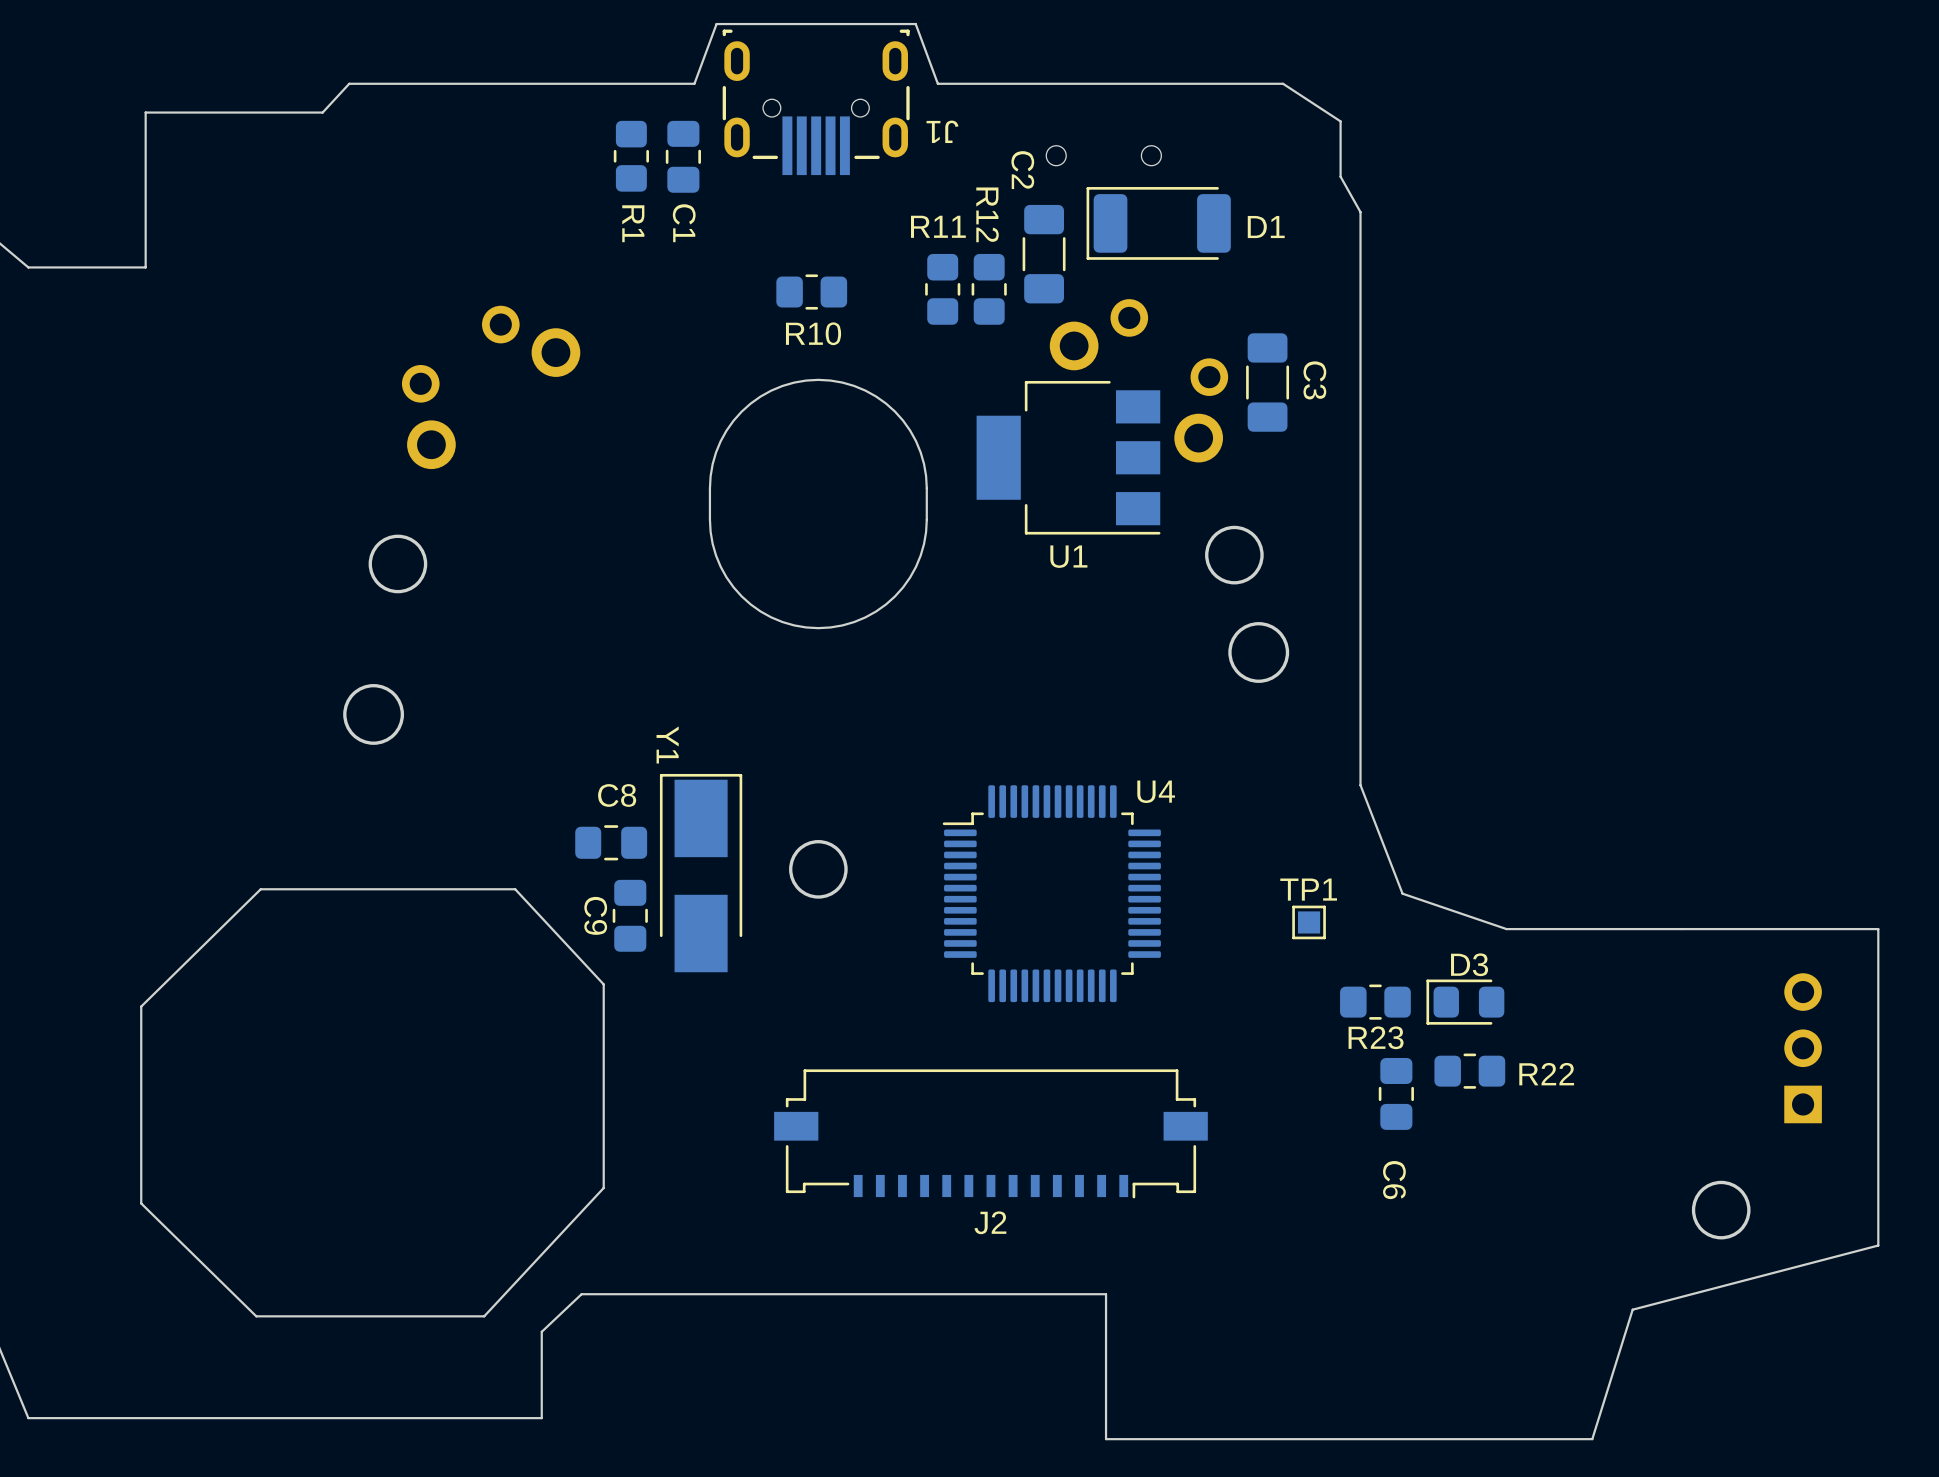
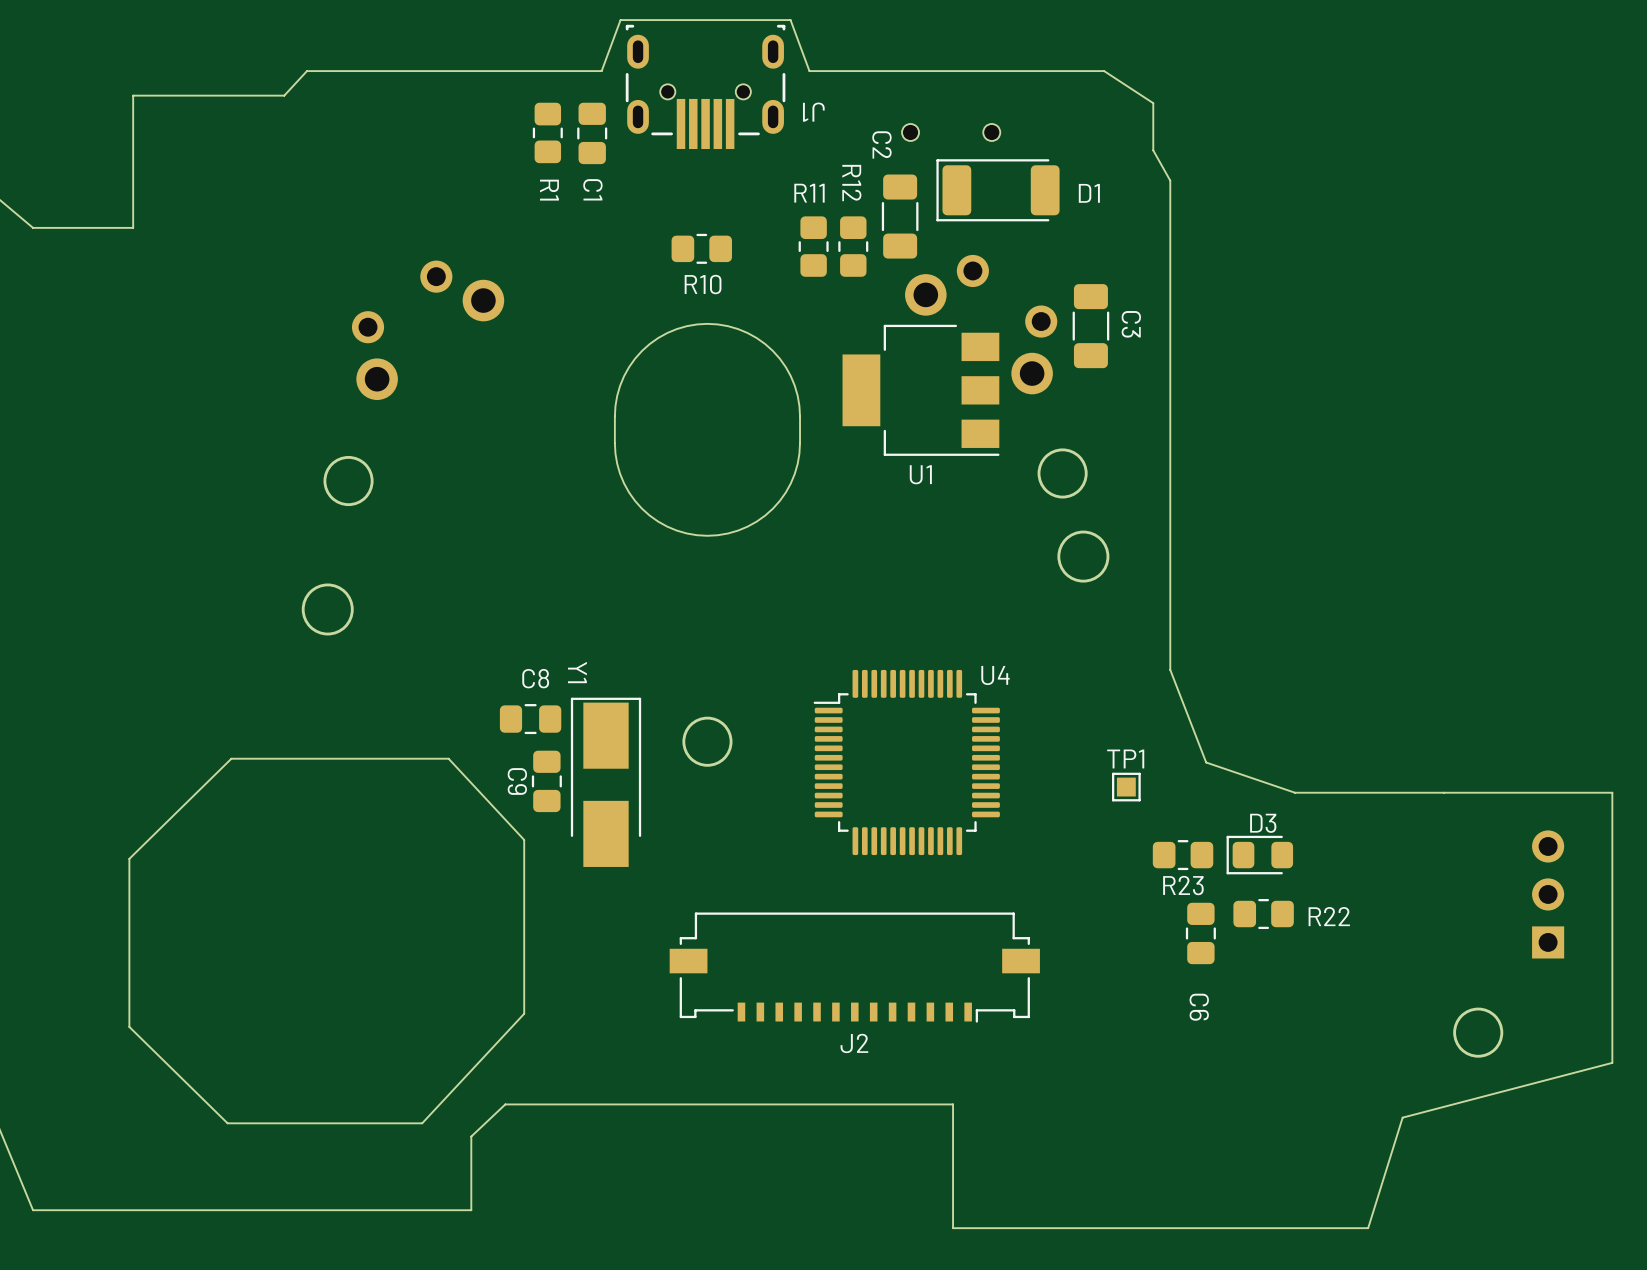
Y1 position: (701, 873) -> (606, 782)

